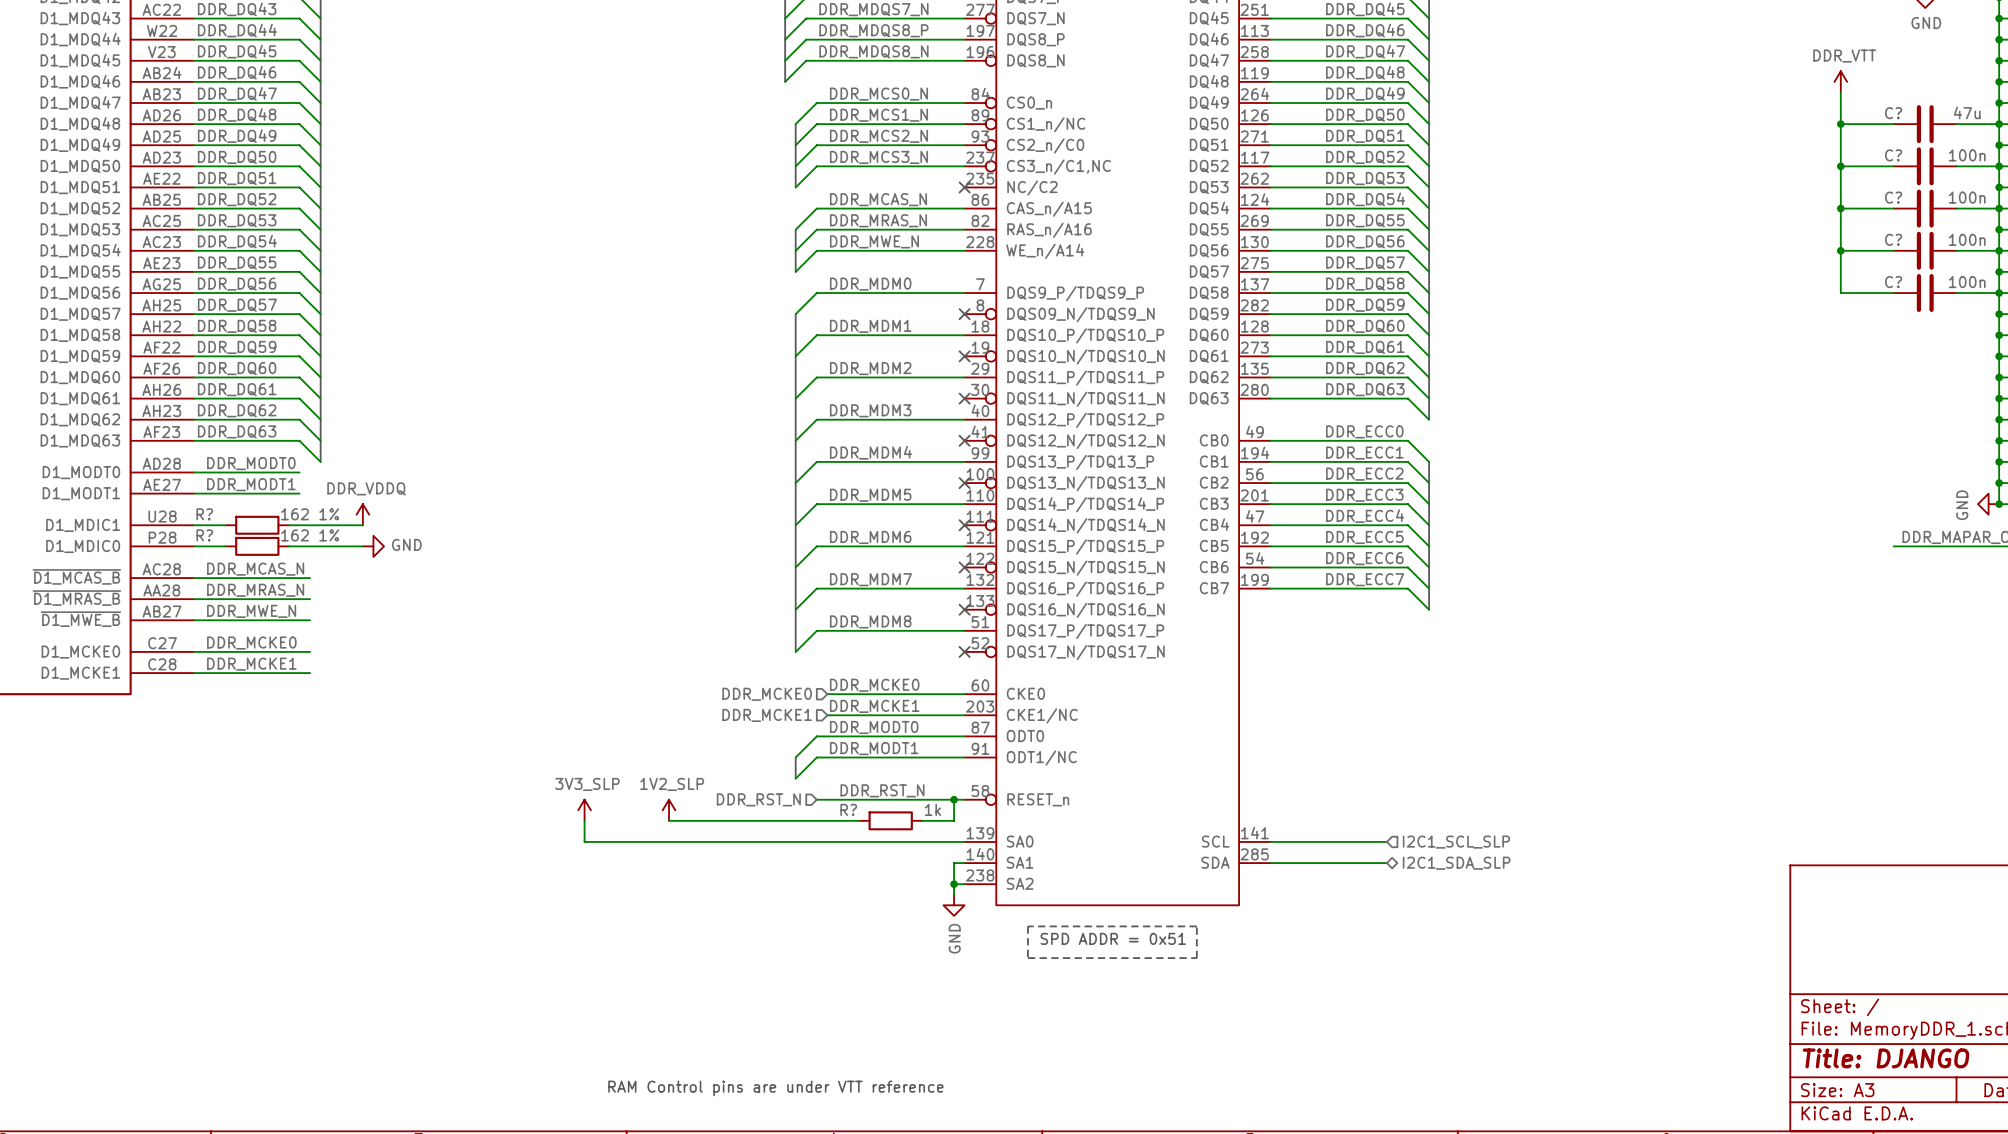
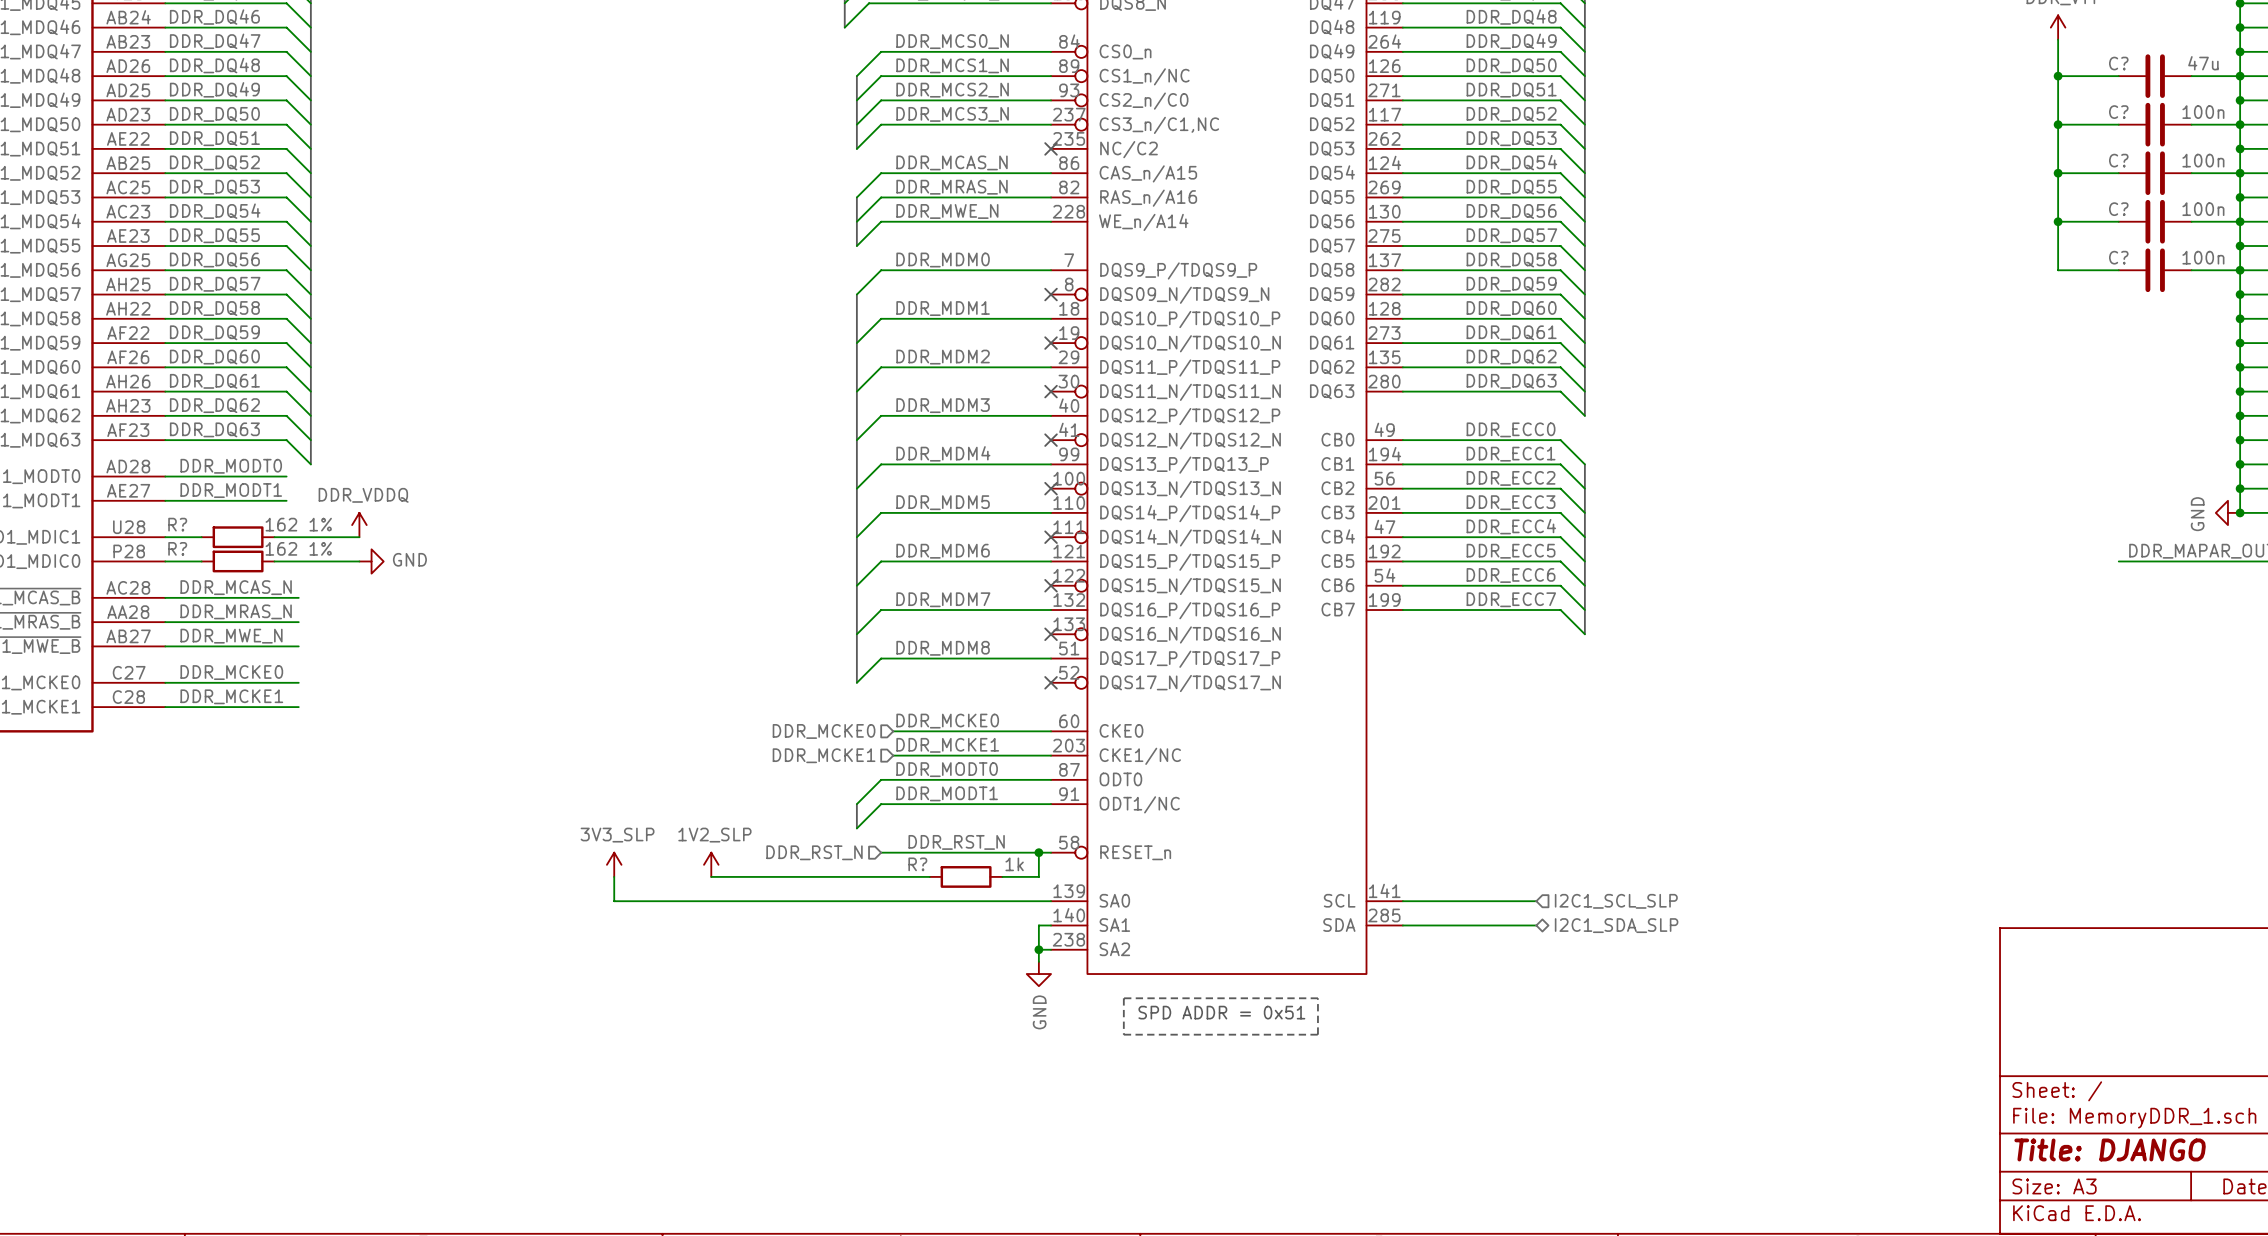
text: RAM Control pins are under VTT reference (775, 1088) -> none

